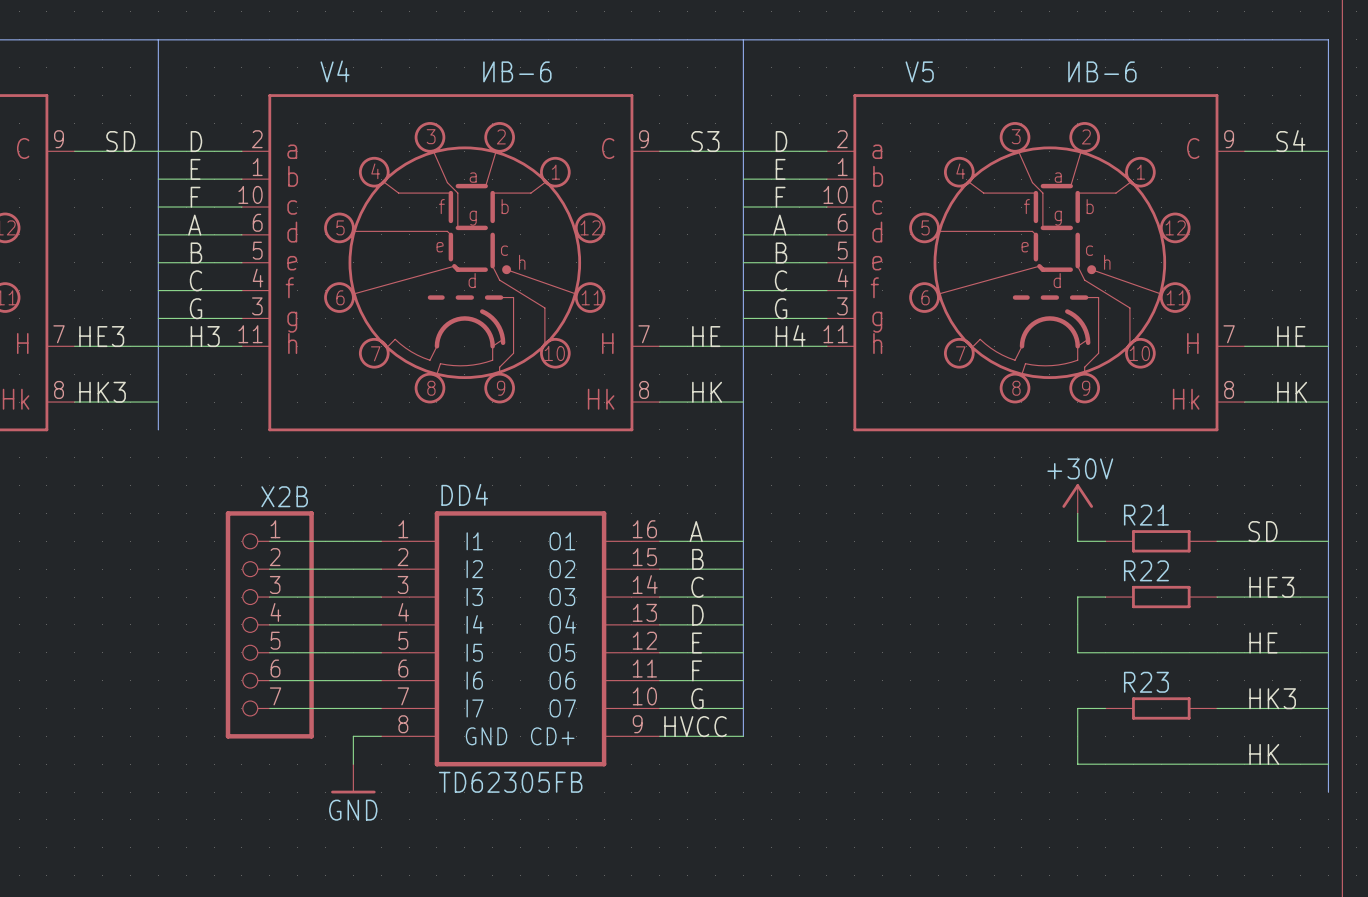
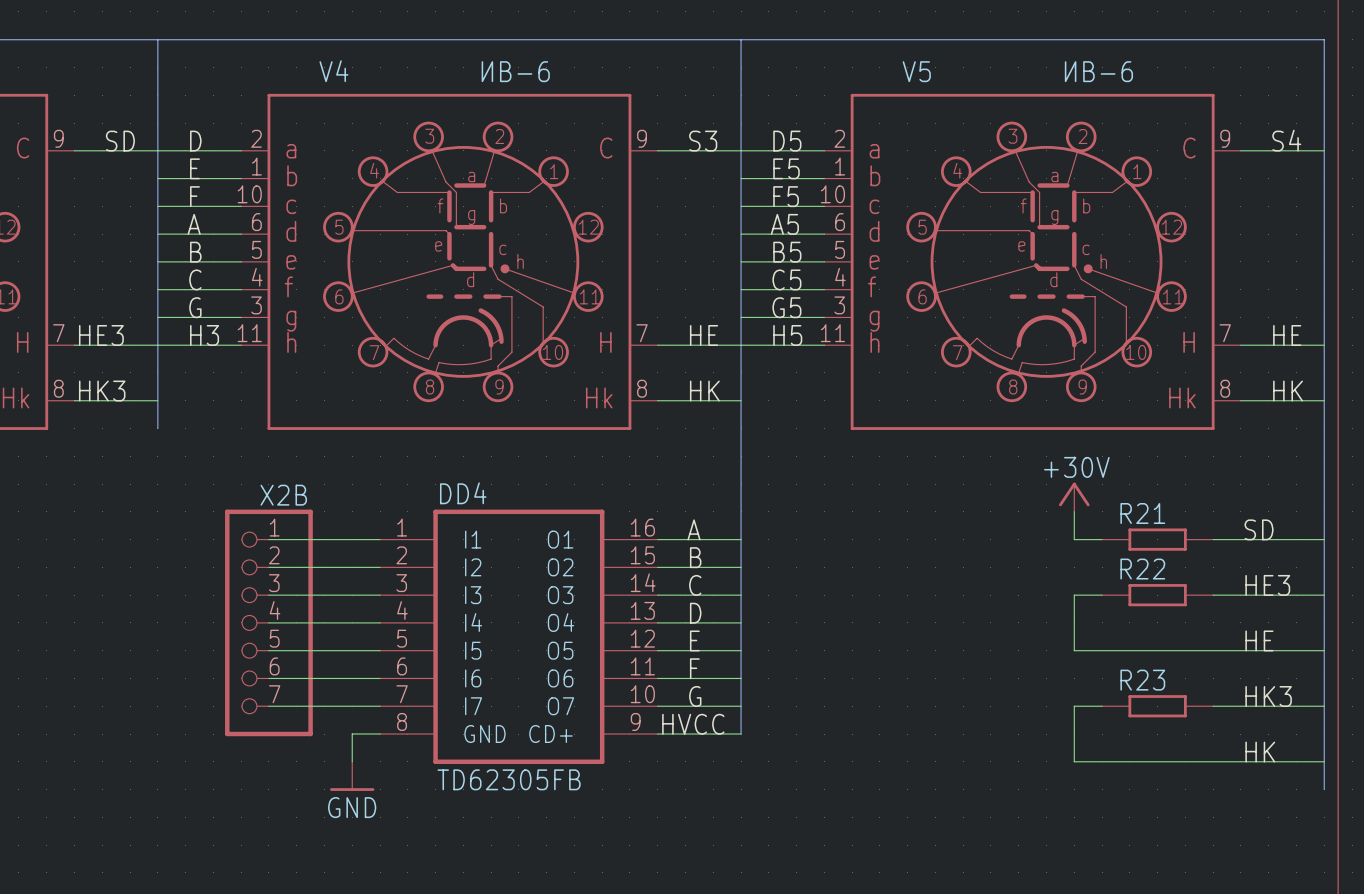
label: D (781, 141) -> D5 (787, 141)
label: E (780, 169) -> E5 (786, 168)
label: F (780, 197) -> F5 (786, 196)
label: A (779, 225) -> A5 (784, 224)
label: B (781, 252) -> B5 (787, 252)
label: C (781, 280) -> C5 (786, 279)
label: G (781, 308) -> G5 (786, 307)
label: H4 (790, 336) -> H5 (787, 335)

